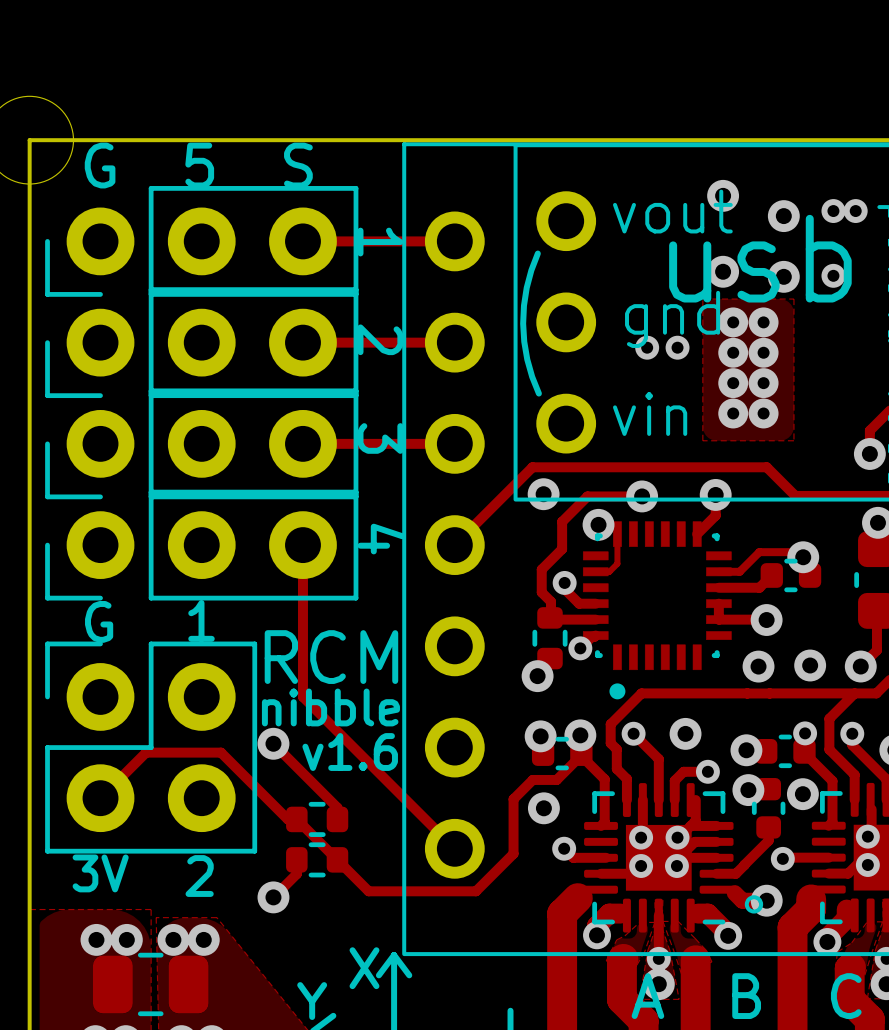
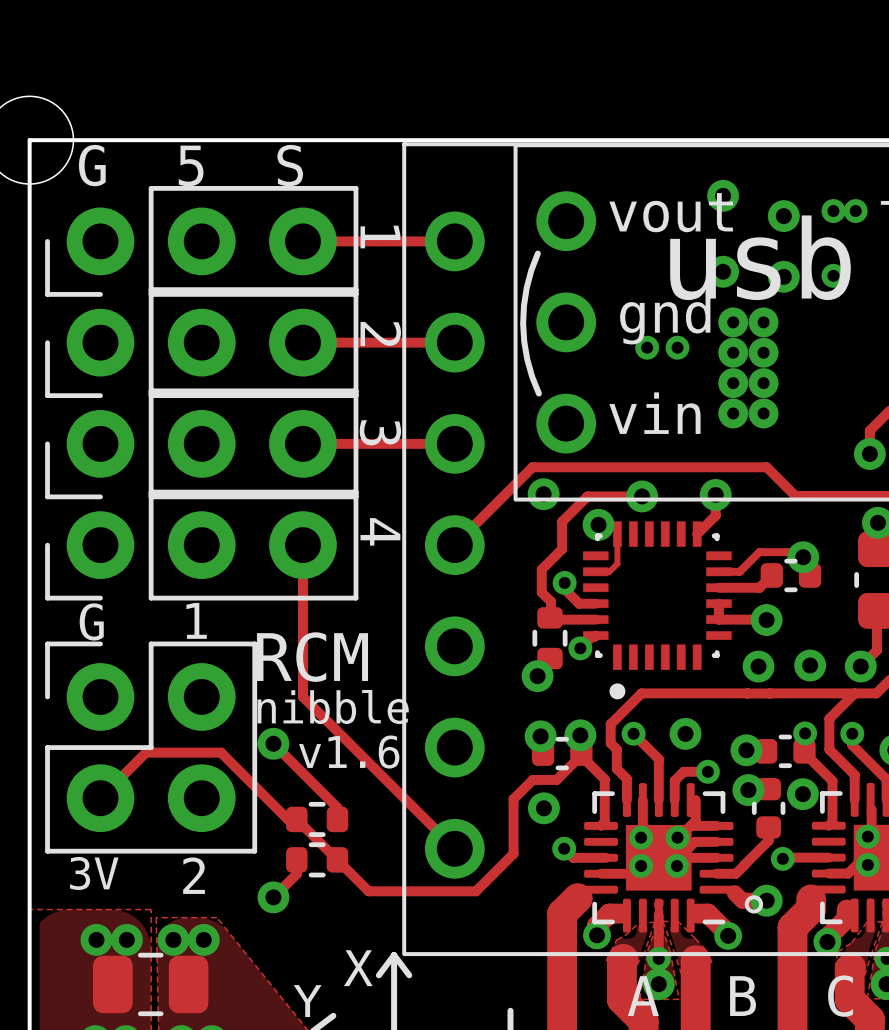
zone outline: (702, 299) (702, 440) (793, 440) (793, 299) (702, 299) -> none

